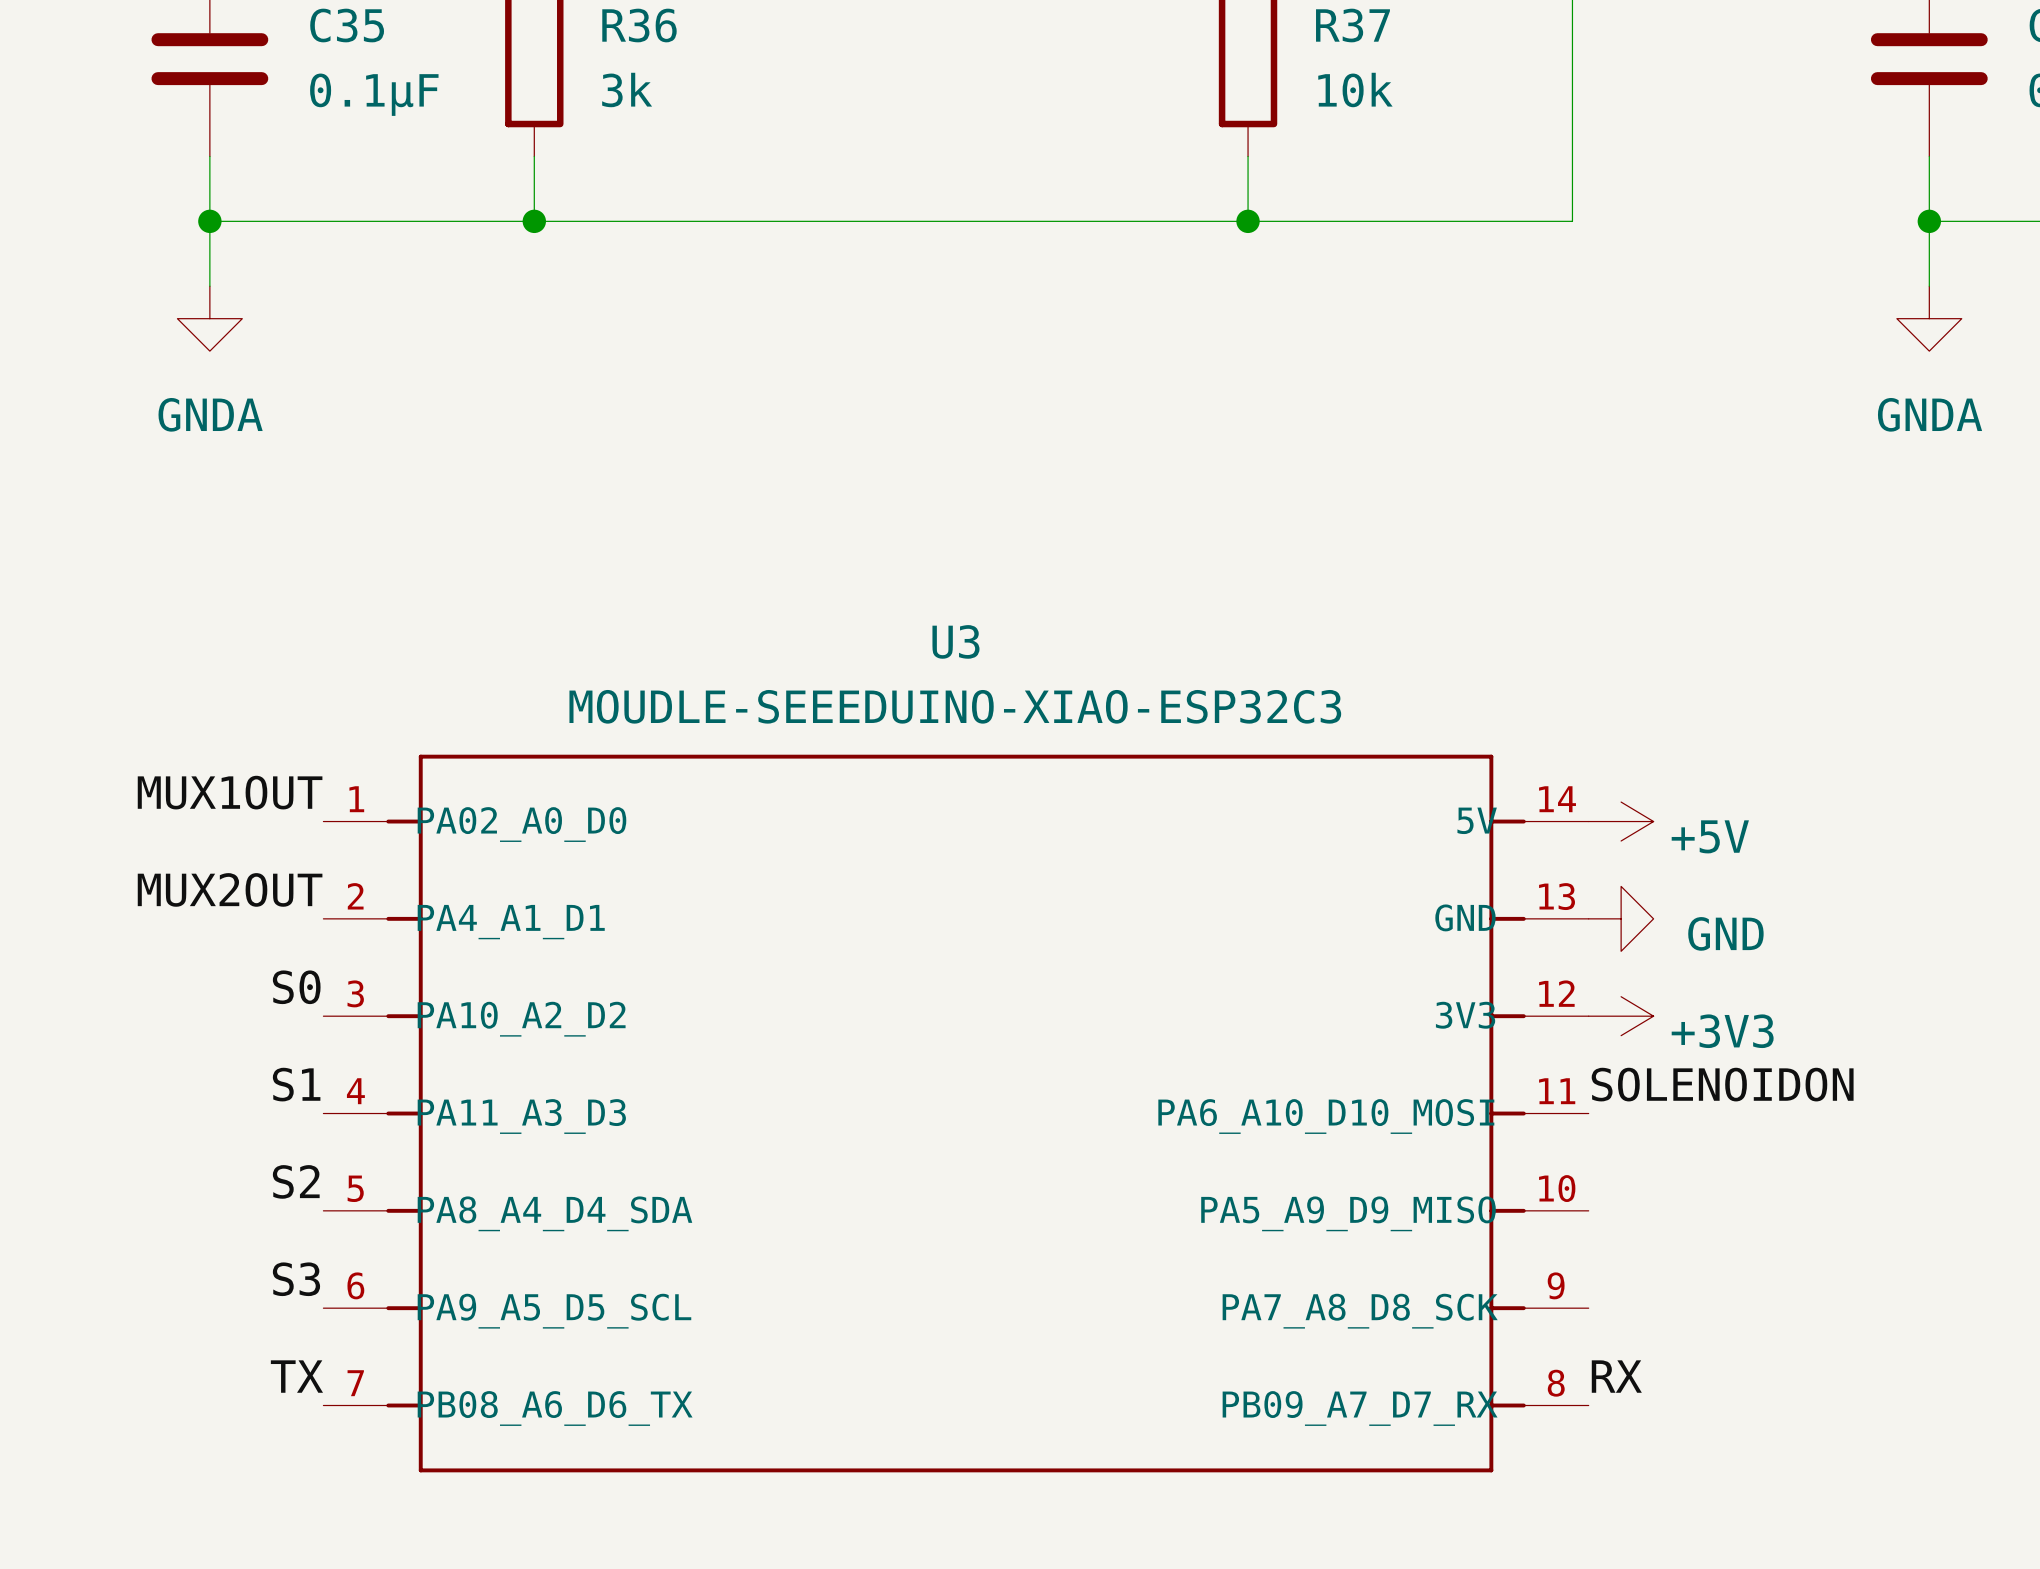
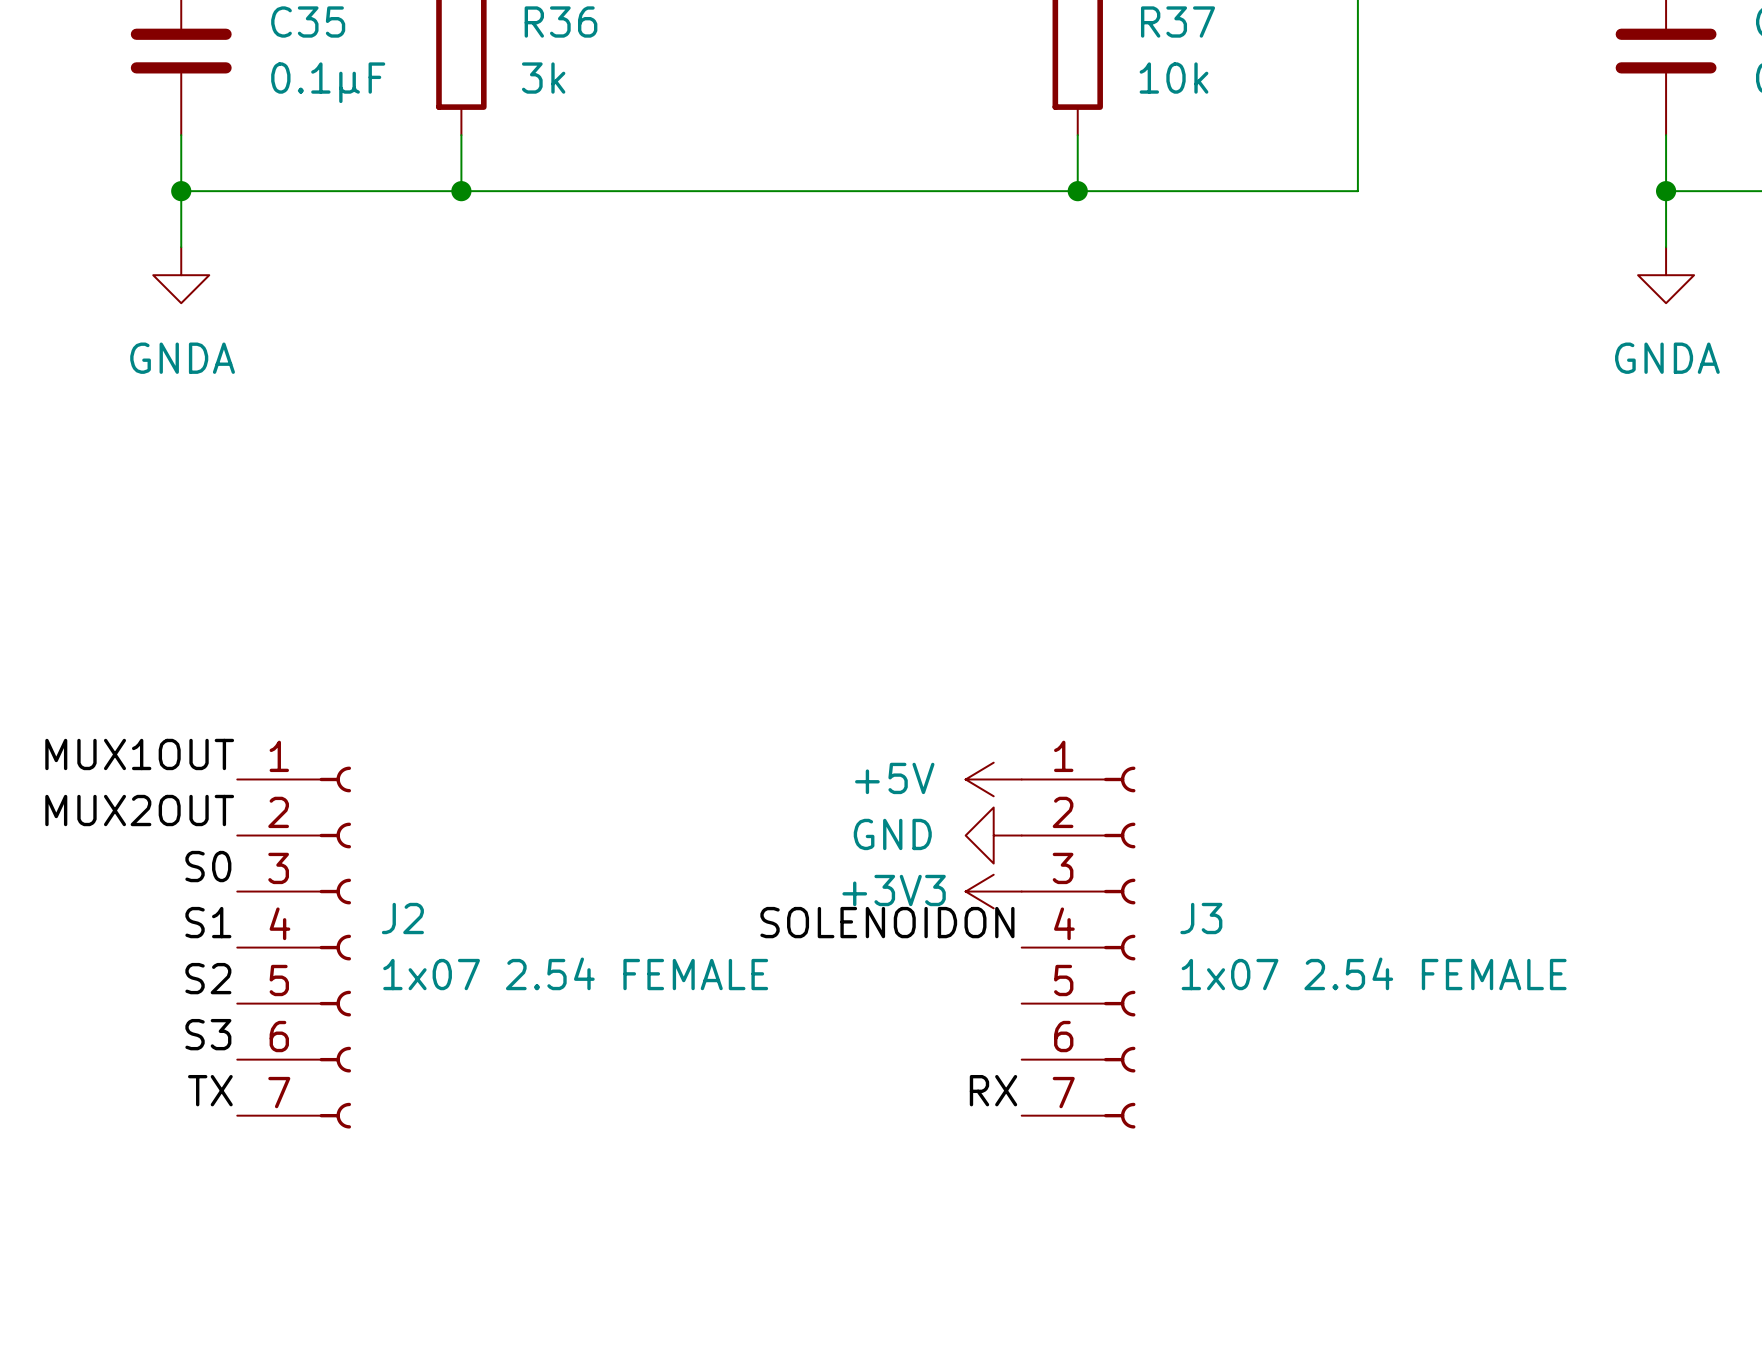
label position: MUX1OUT (230, 792) -> MUX1OUT (139, 754)
power symbol rotation: 0° (1621, 821) -> 180° (993, 779)
power symbol position: +5V (1621, 821) -> +5V (993, 779)
label position: MUX2OUT (230, 889) -> MUX2OUT (139, 810)
power symbol rotation: 0° (1621, 918) -> 180° (993, 835)
power symbol position: GND (1621, 918) -> GND (993, 835)
label position: S0 (296, 987) -> S0 (208, 866)
power symbol rotation: 0° (1621, 1016) -> 180° (993, 891)
power symbol position: +3V3 (1621, 1016) -> +3V3 (993, 891)
label position: S1 (296, 1084) -> S1 (208, 922)
label position: SOLENOIDON (1722, 1084) -> SOLENOIDON (887, 922)
J2: none -> 1x07 2.54 FEMALE (294, 947)
J3: none -> 1x07 2.54 FEMALE (1078, 947)
U3: MOUDLE-SEEEDUINO-XIAO-ESP32C3 (956, 1113) -> none
label position: S2 (296, 1181) -> S2 (208, 978)
label position: S3 (296, 1279) -> S3 (208, 1034)
label position: TX (296, 1376) -> TX (210, 1090)
label position: RX (1616, 1376) -> RX (993, 1090)

